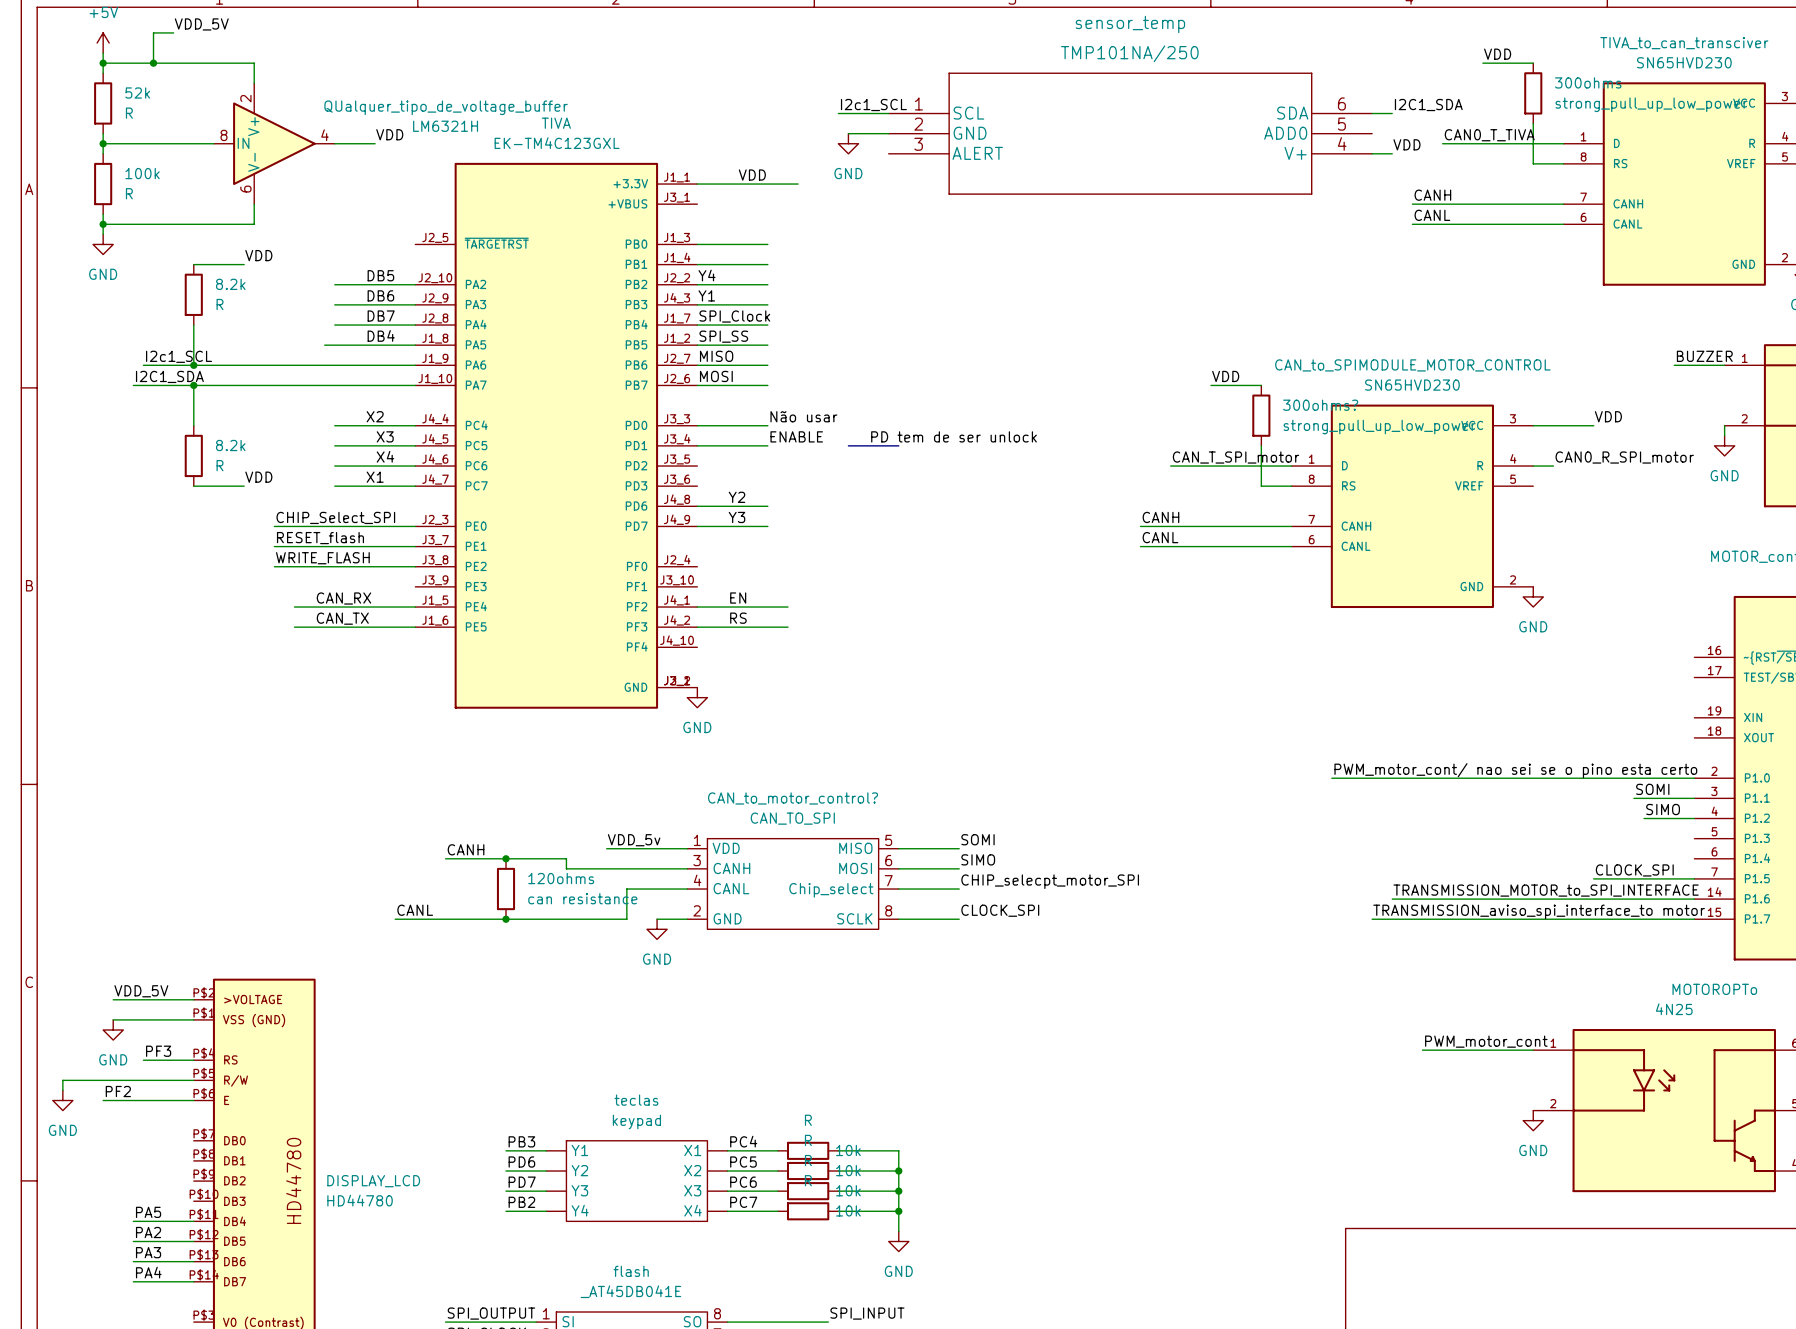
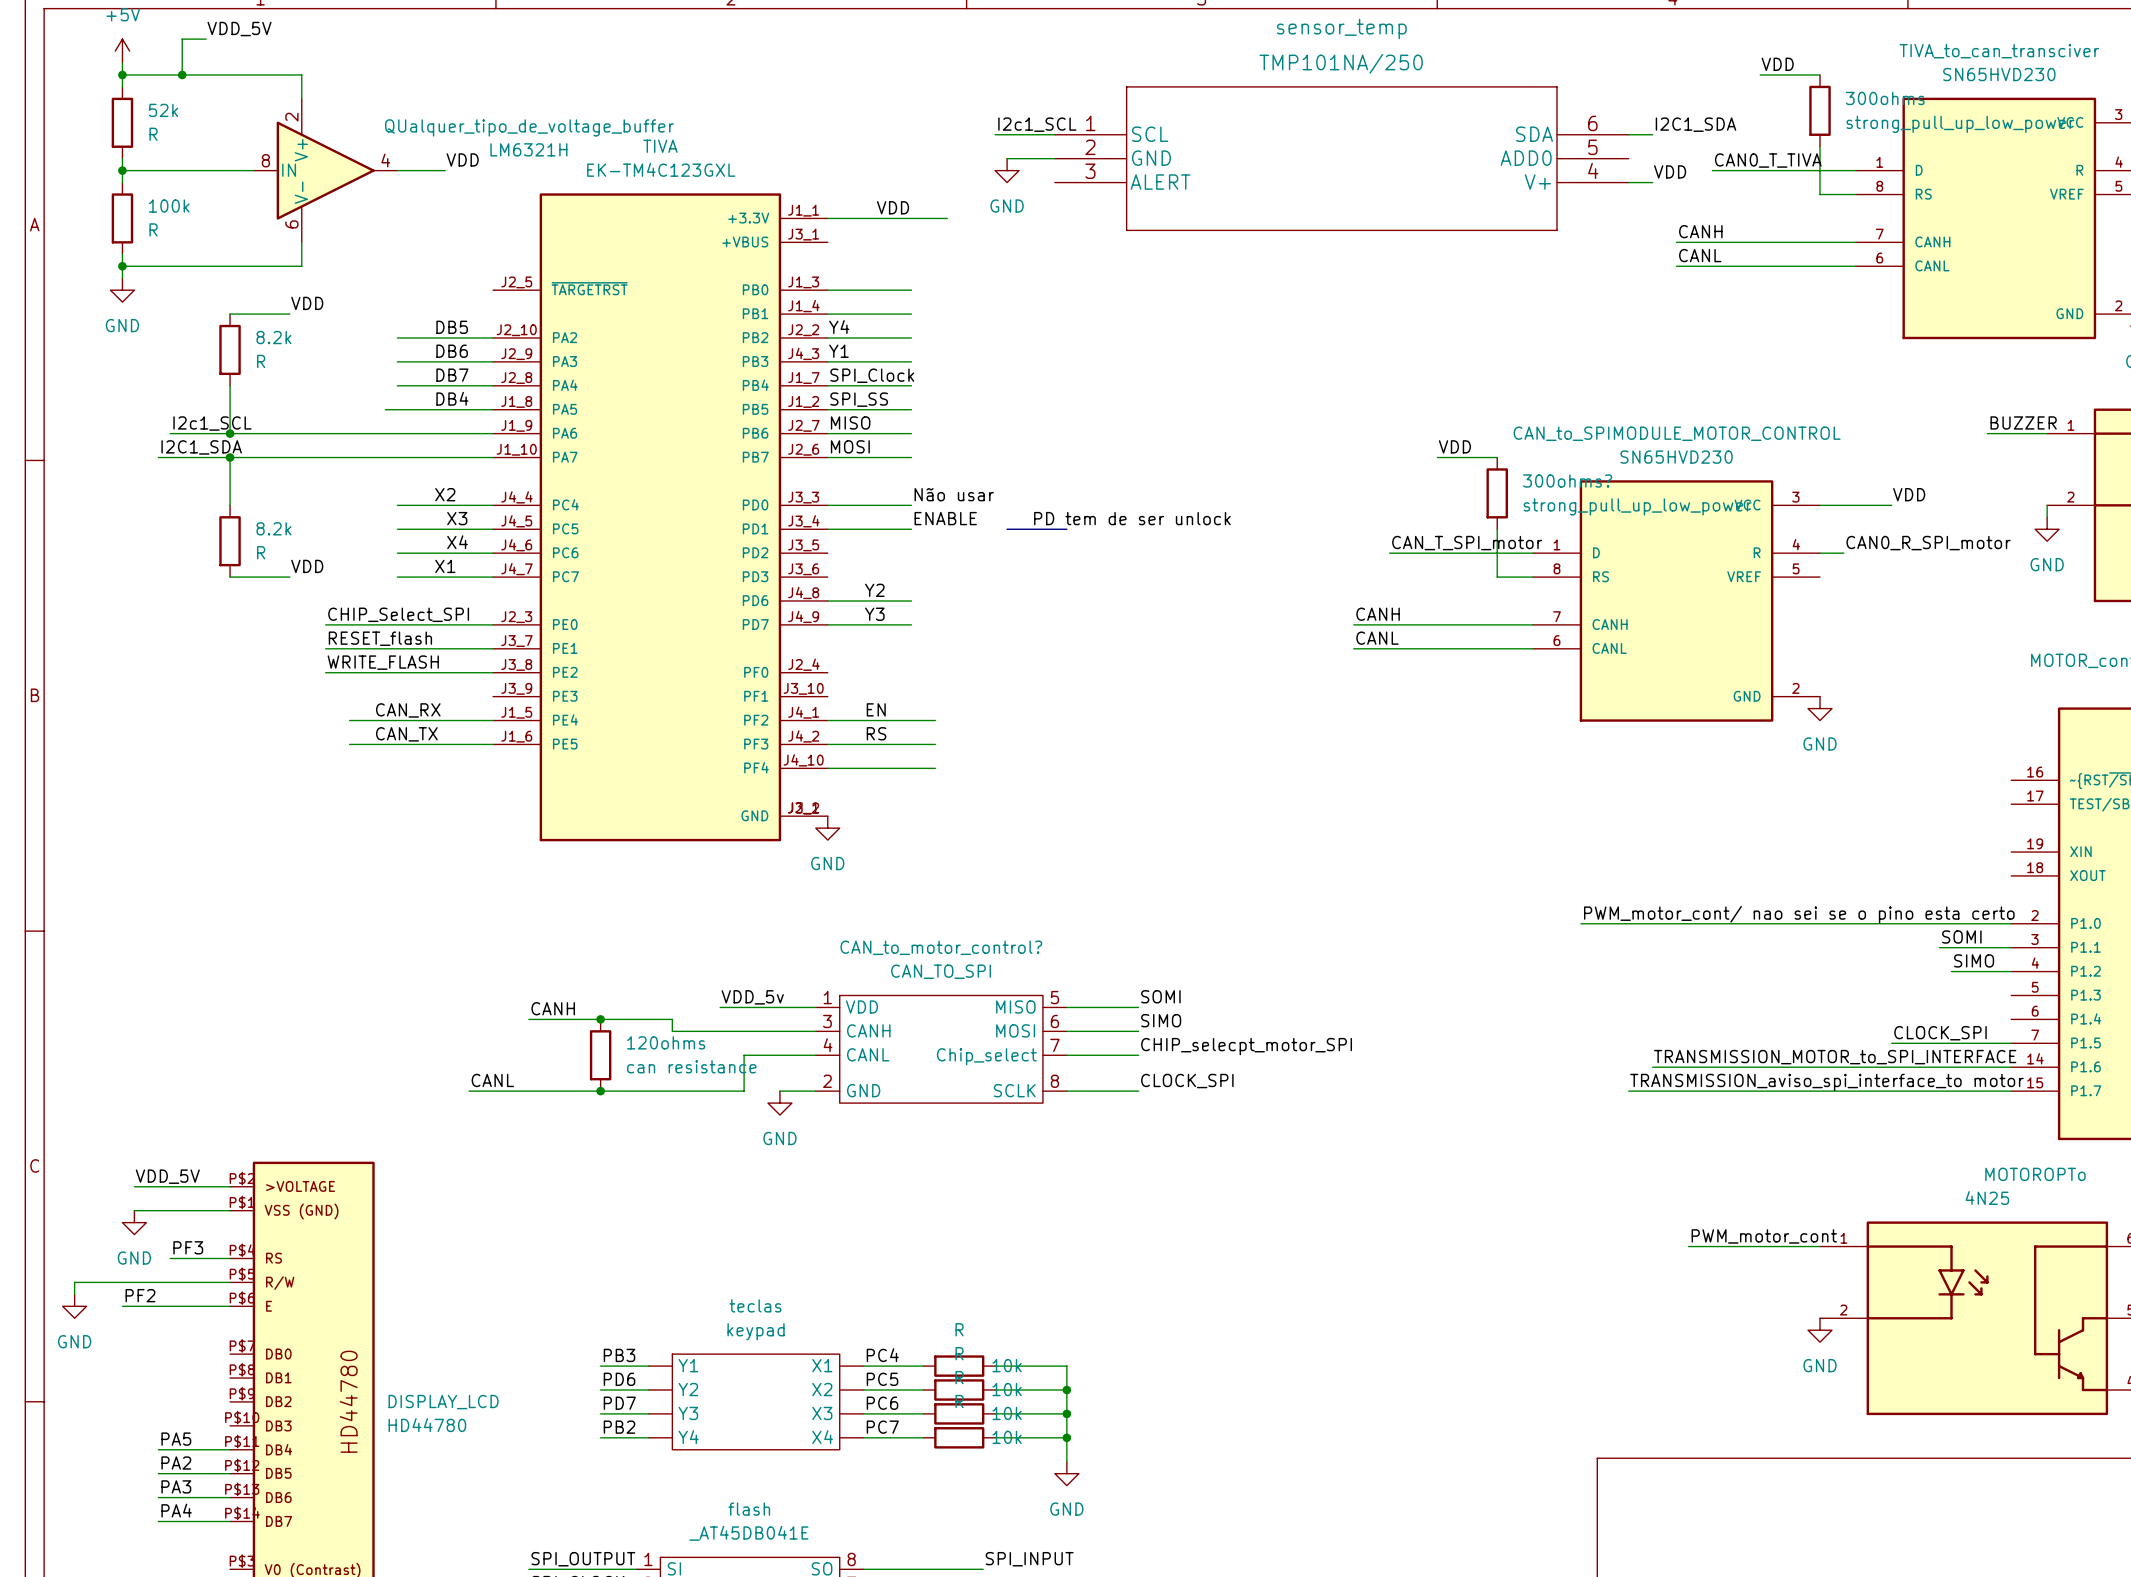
wire: none -> (827, 768) (935, 768)

